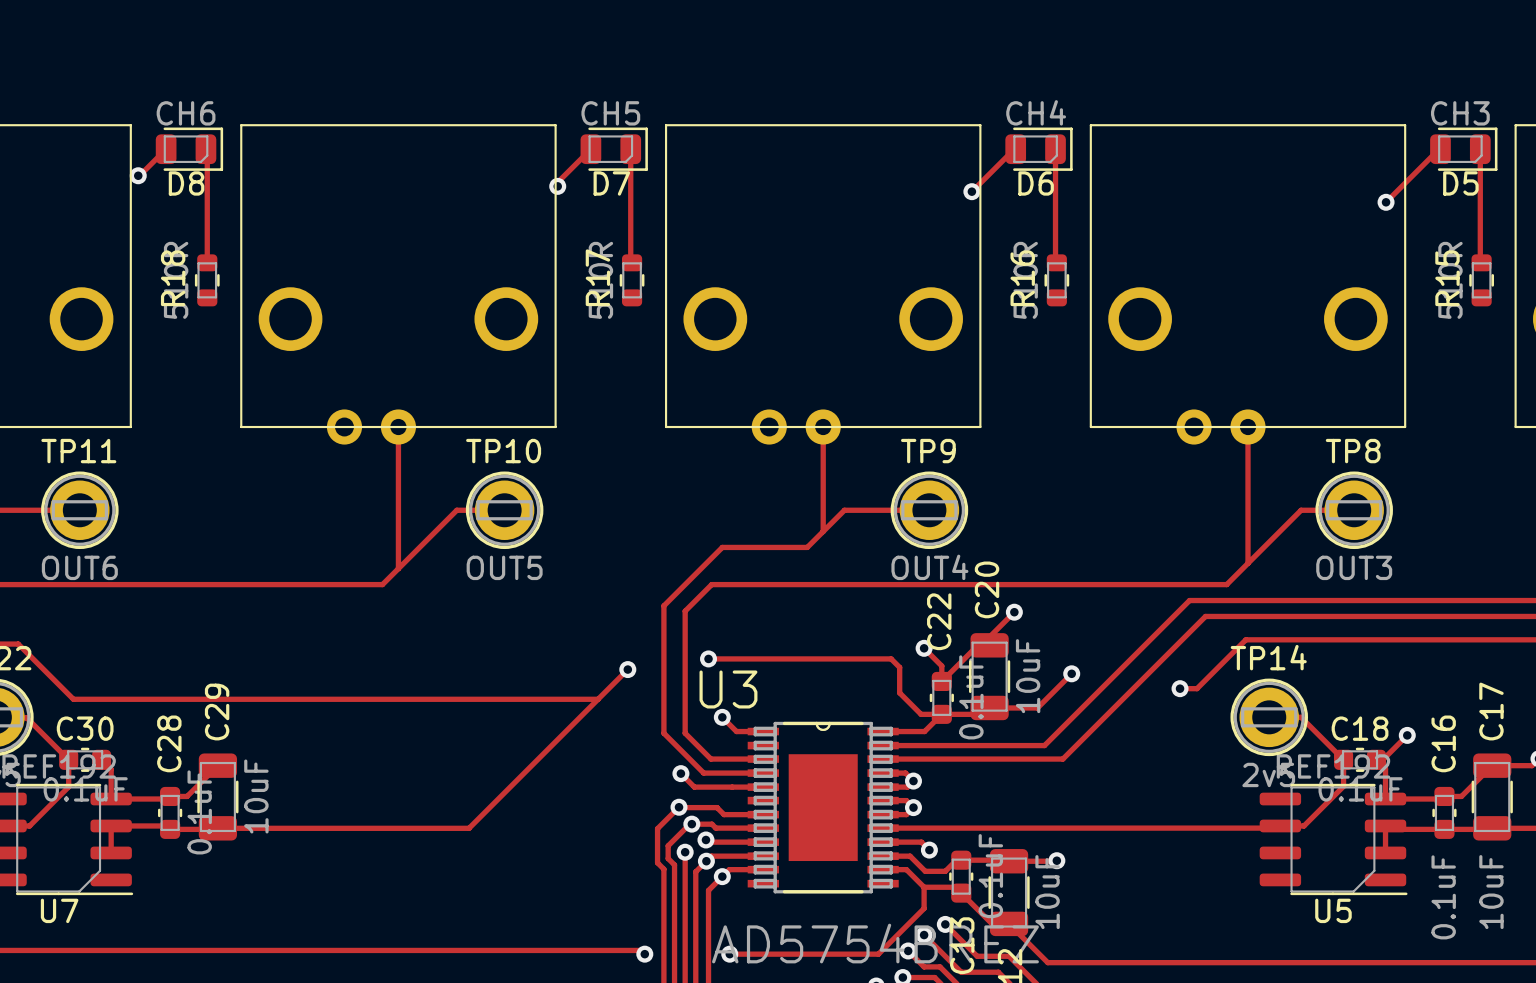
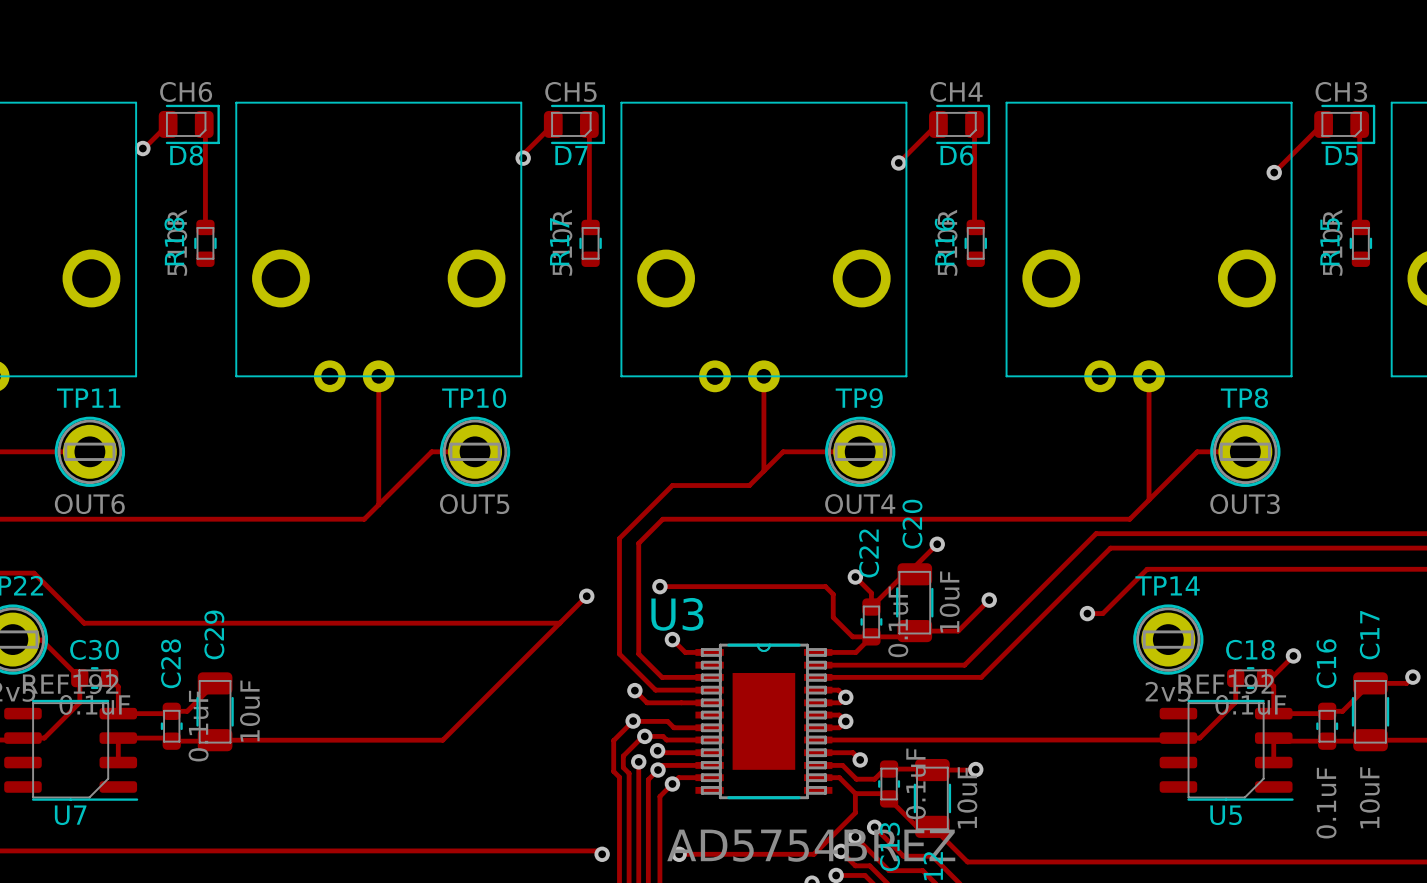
track: (1269, 717) (1301, 717) (1343, 759) -> none

